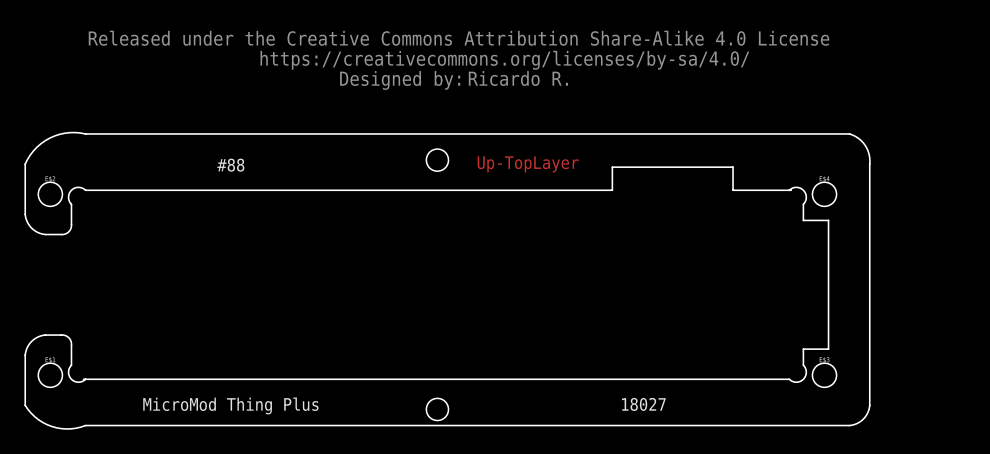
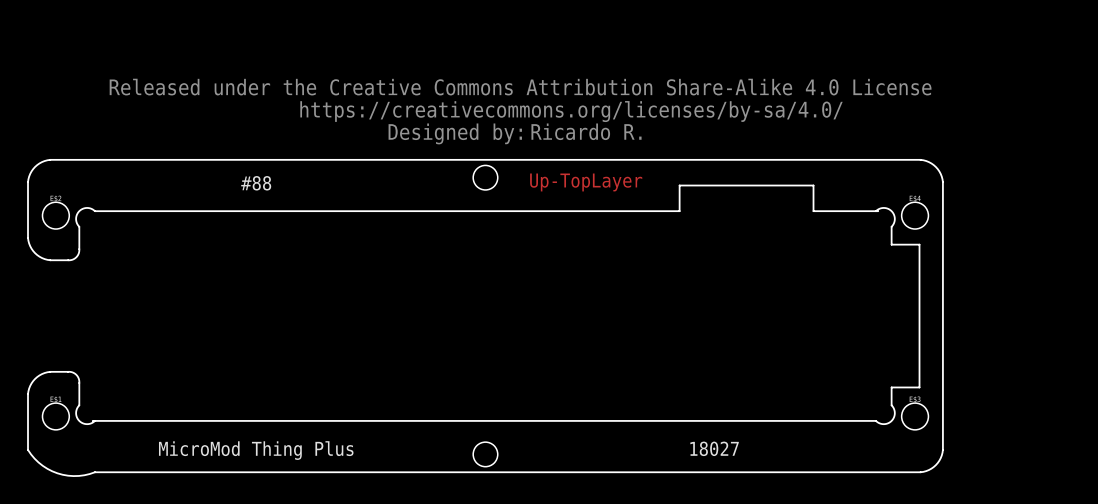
drawing position: (459, 60) -> (520, 111)
text position: Ricardo R. (518, 78) -> Ricardo R. (586, 131)
board edge: (25, 164) (33, 150) (41, 143) (54, 135) (69, 132) (849, 133) (863, 142) (869, 157) (869, 405) (865, 417) (857, 423) (829, 425) -> (28, 182) (35, 166) (50, 159) (926, 161) (937, 169) (942, 182) (942, 449) (935, 465) (920, 472)

